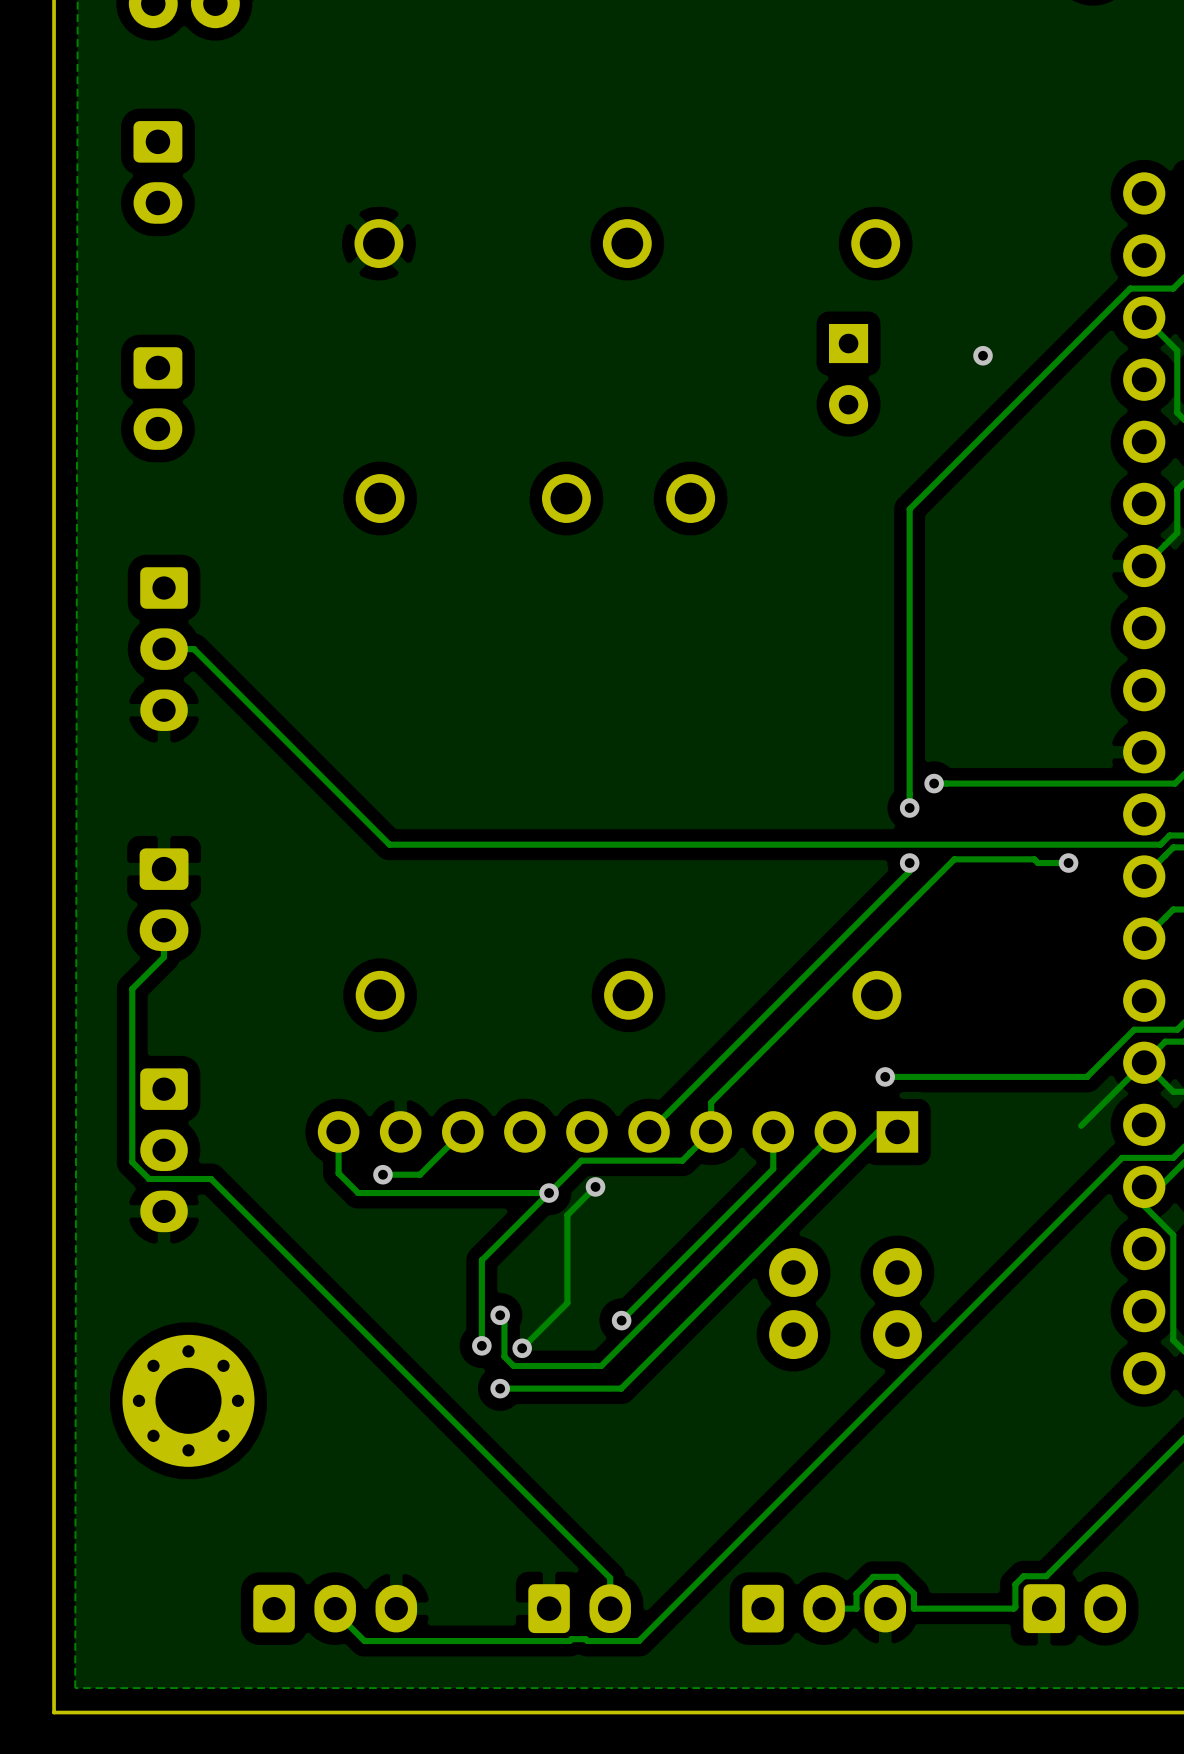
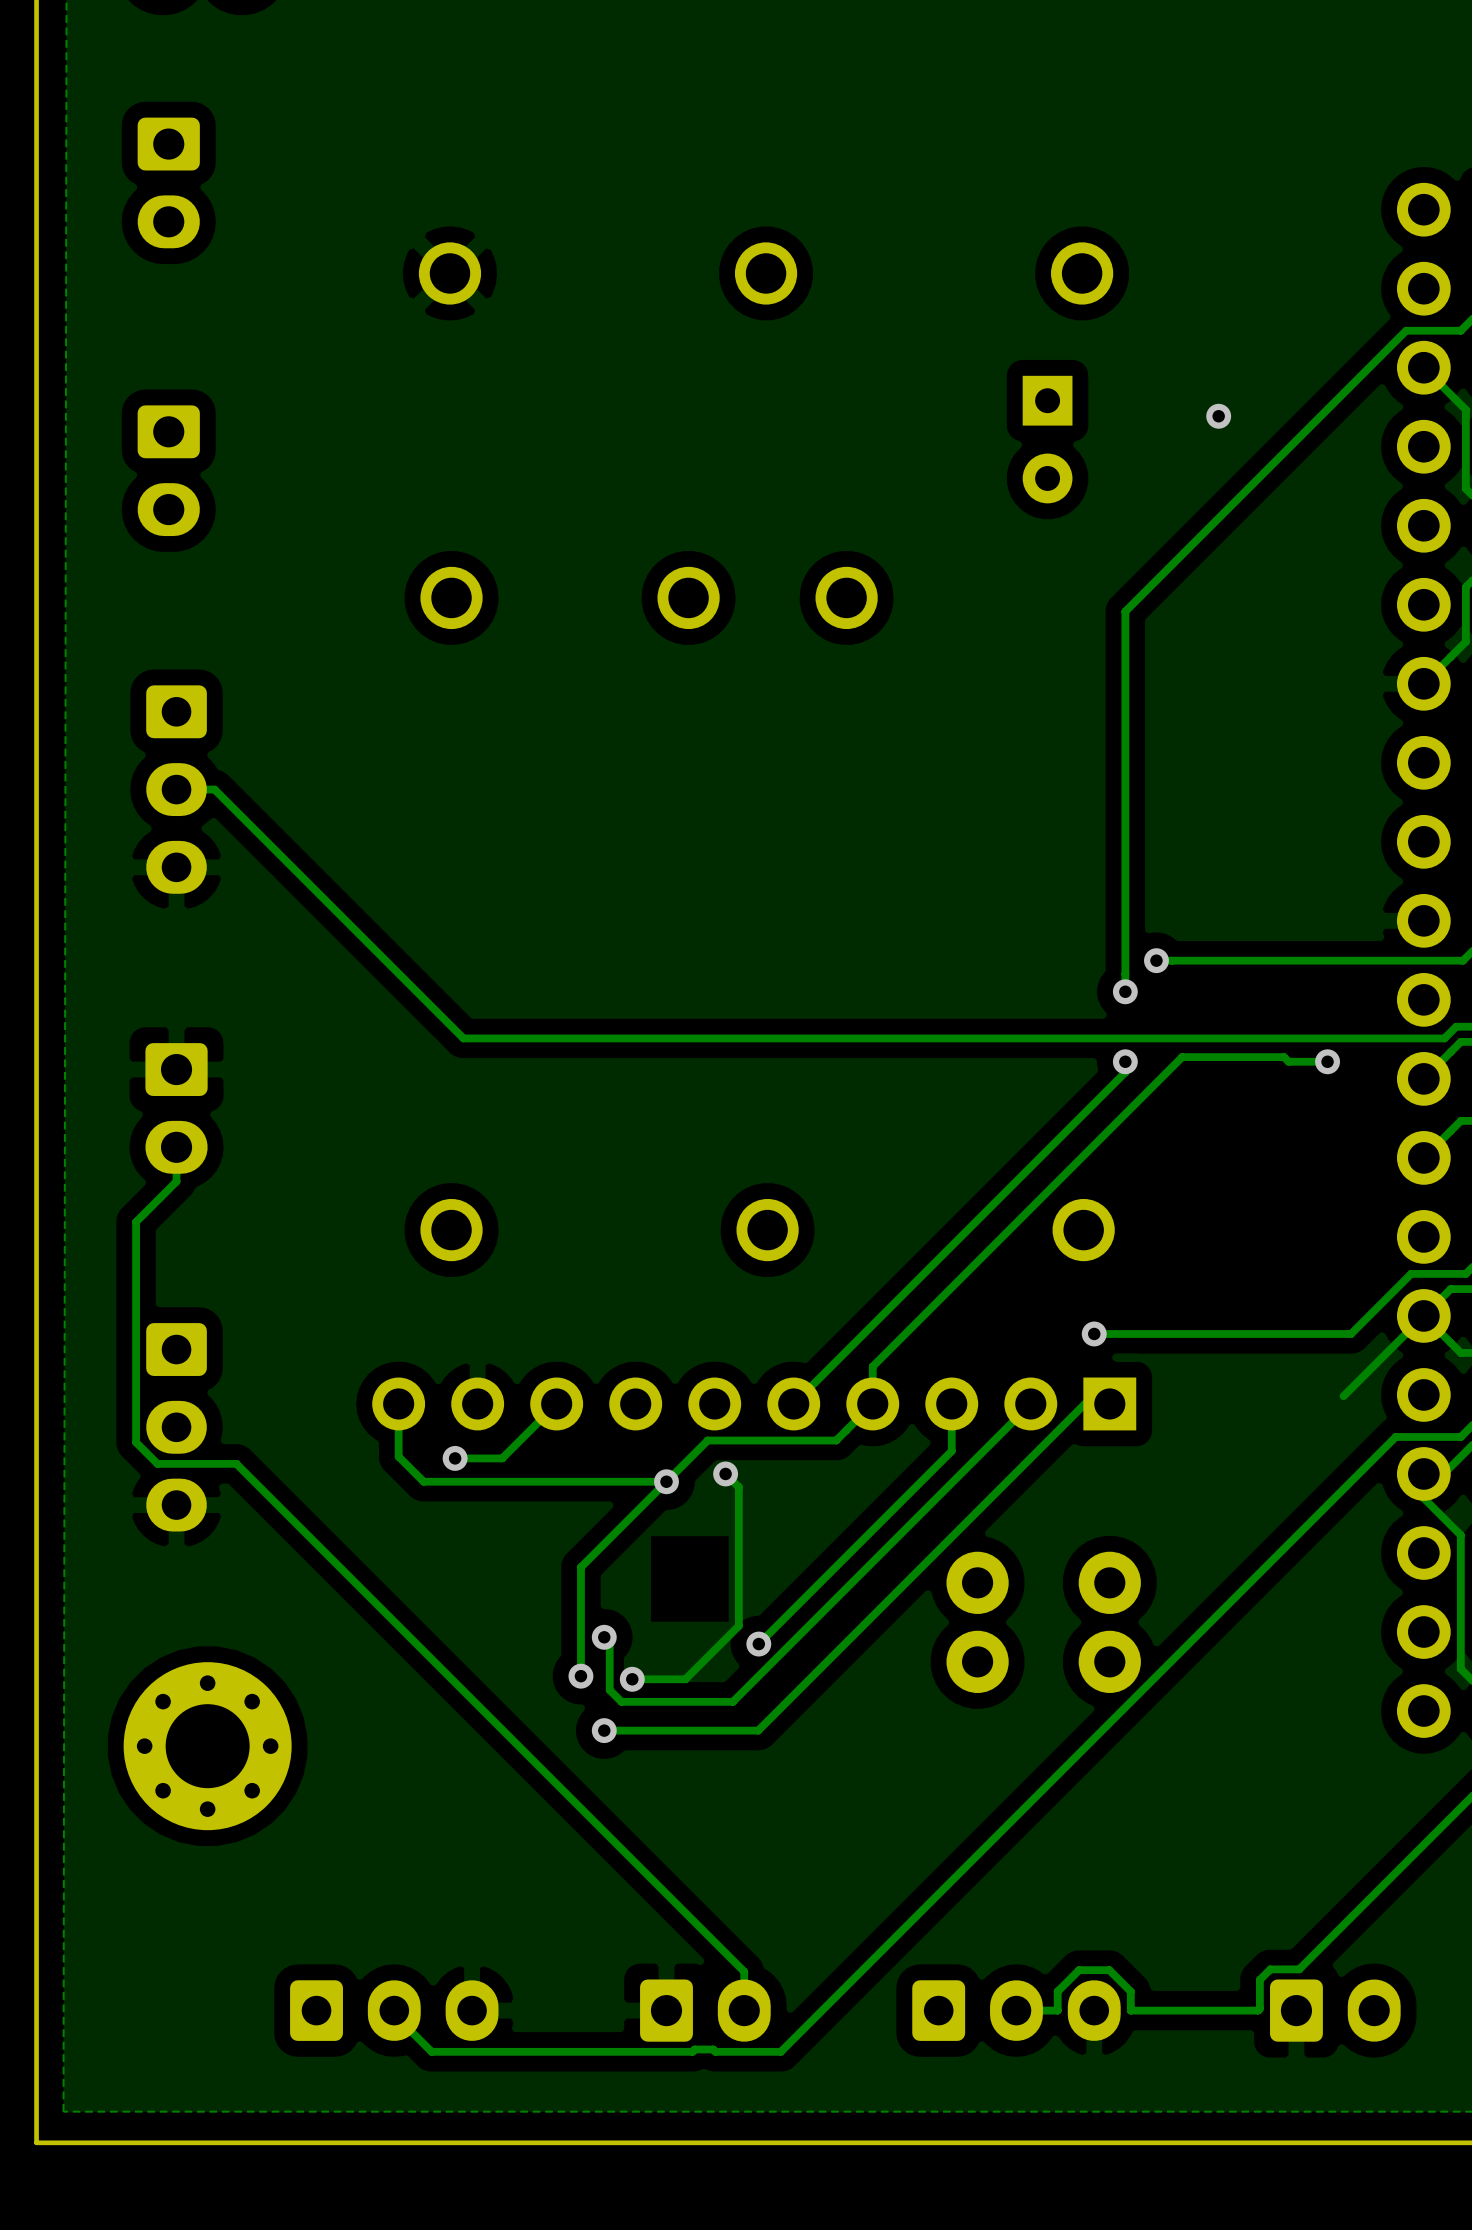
track: (595, 1186) (567, 1215) (567, 1303) (522, 1348) -> (725, 1473) (738, 1487) (738, 1625) (685, 1679) (632, 1679)

